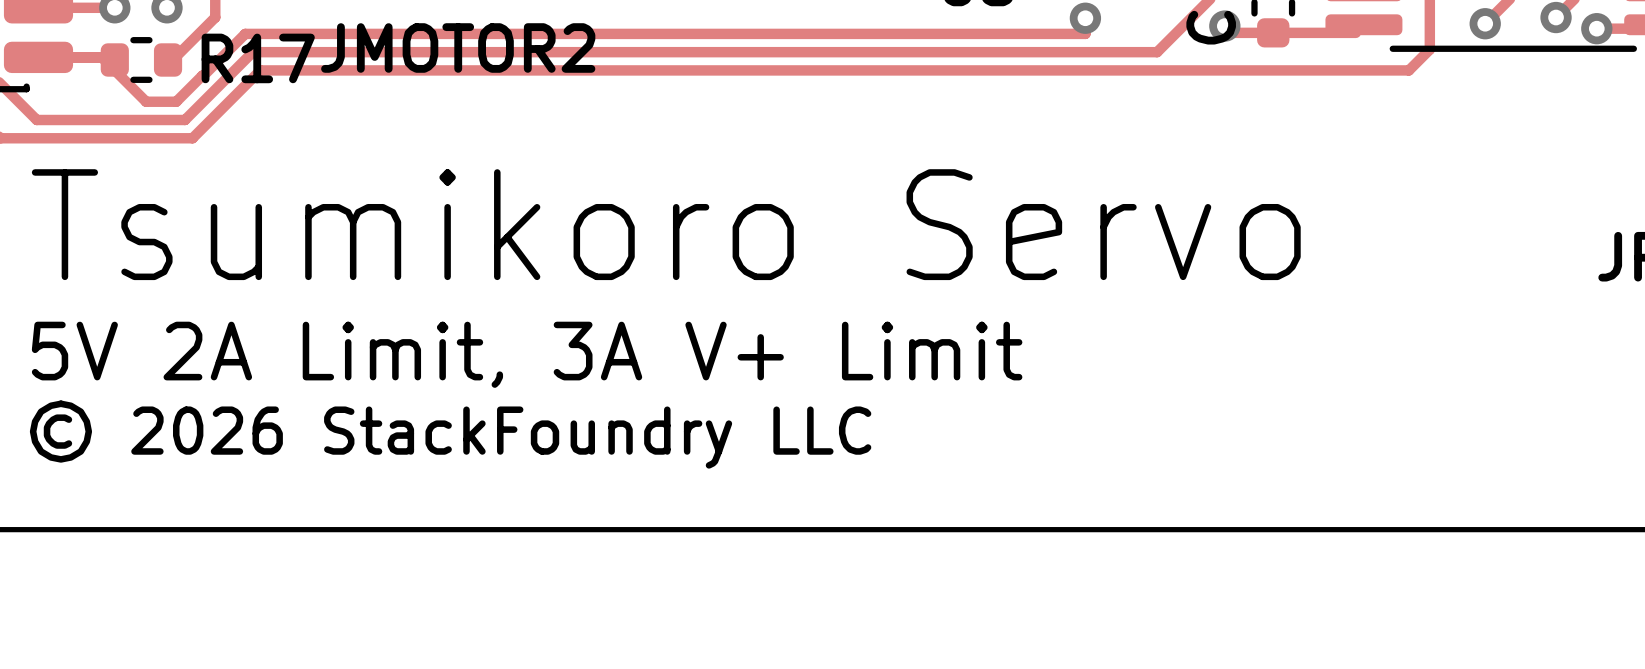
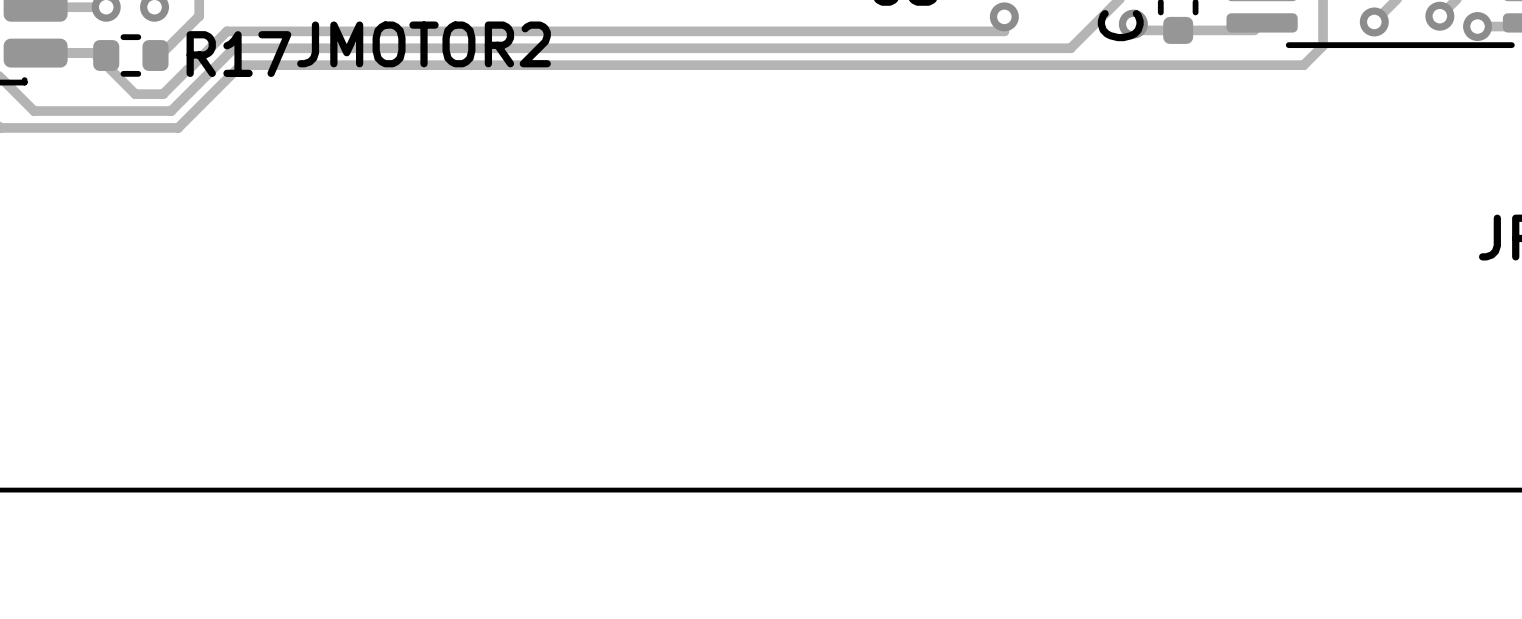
text: Tsumikoro Servo (666, 224) -> none
text: 5V 2A Limit, 3A V+ Limit (527, 354) -> none
text: © 2026 StackFoundry LLC (450, 434) -> none

